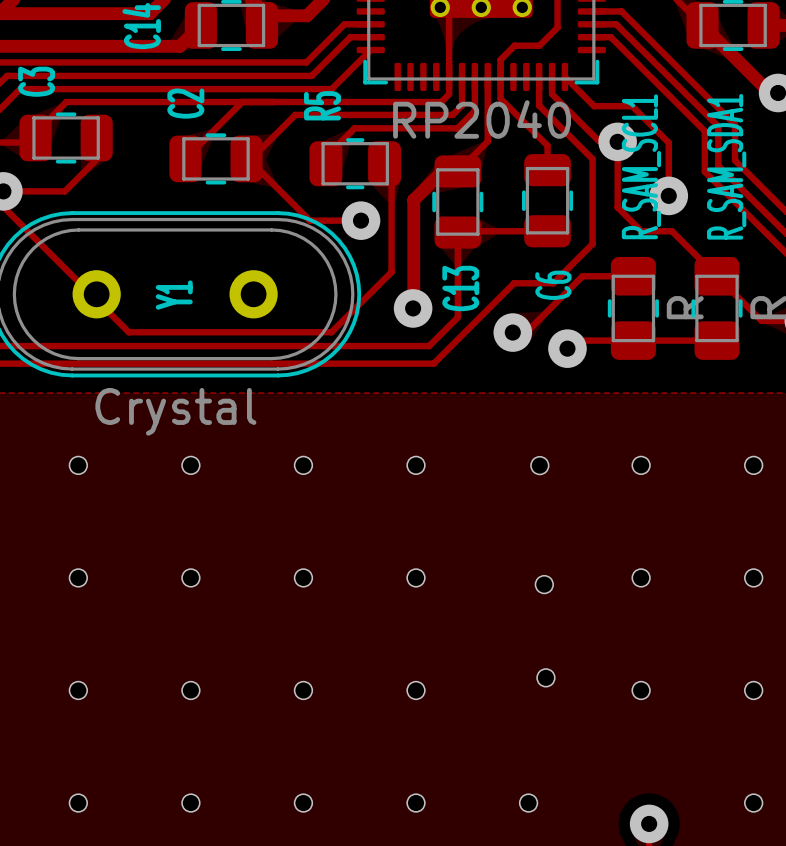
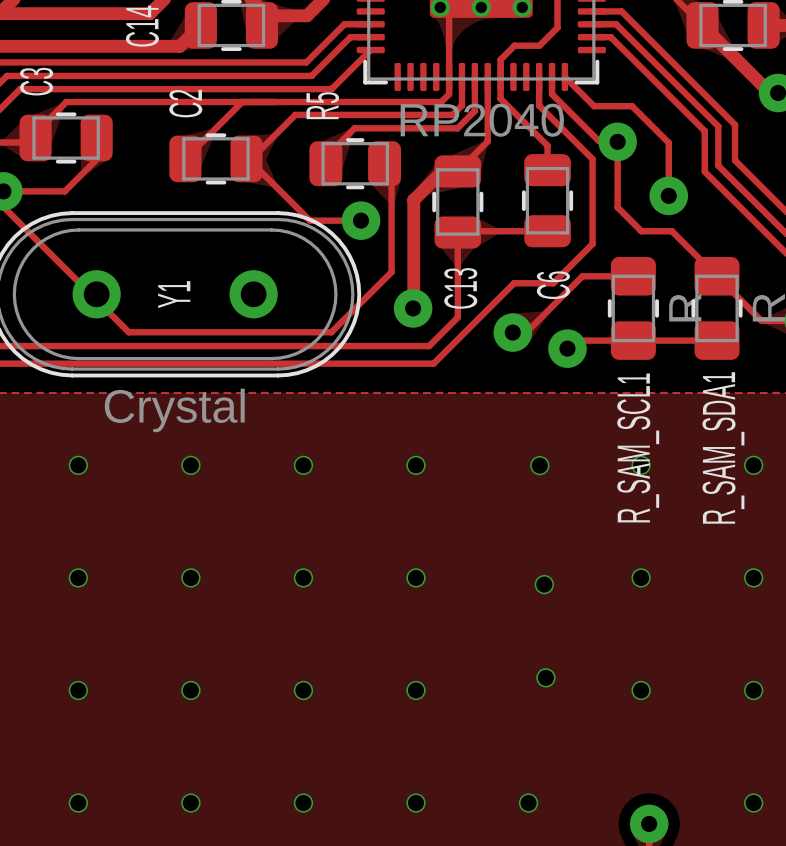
R_SAM_SCL1 name position: R_SAM_SCL1 (641, 166) -> R_SAM_SCL1 (638, 447)
R_SAM_SDA1 name position: R_SAM_SDA1 (726, 166) -> R_SAM_SDA1 (723, 447)

